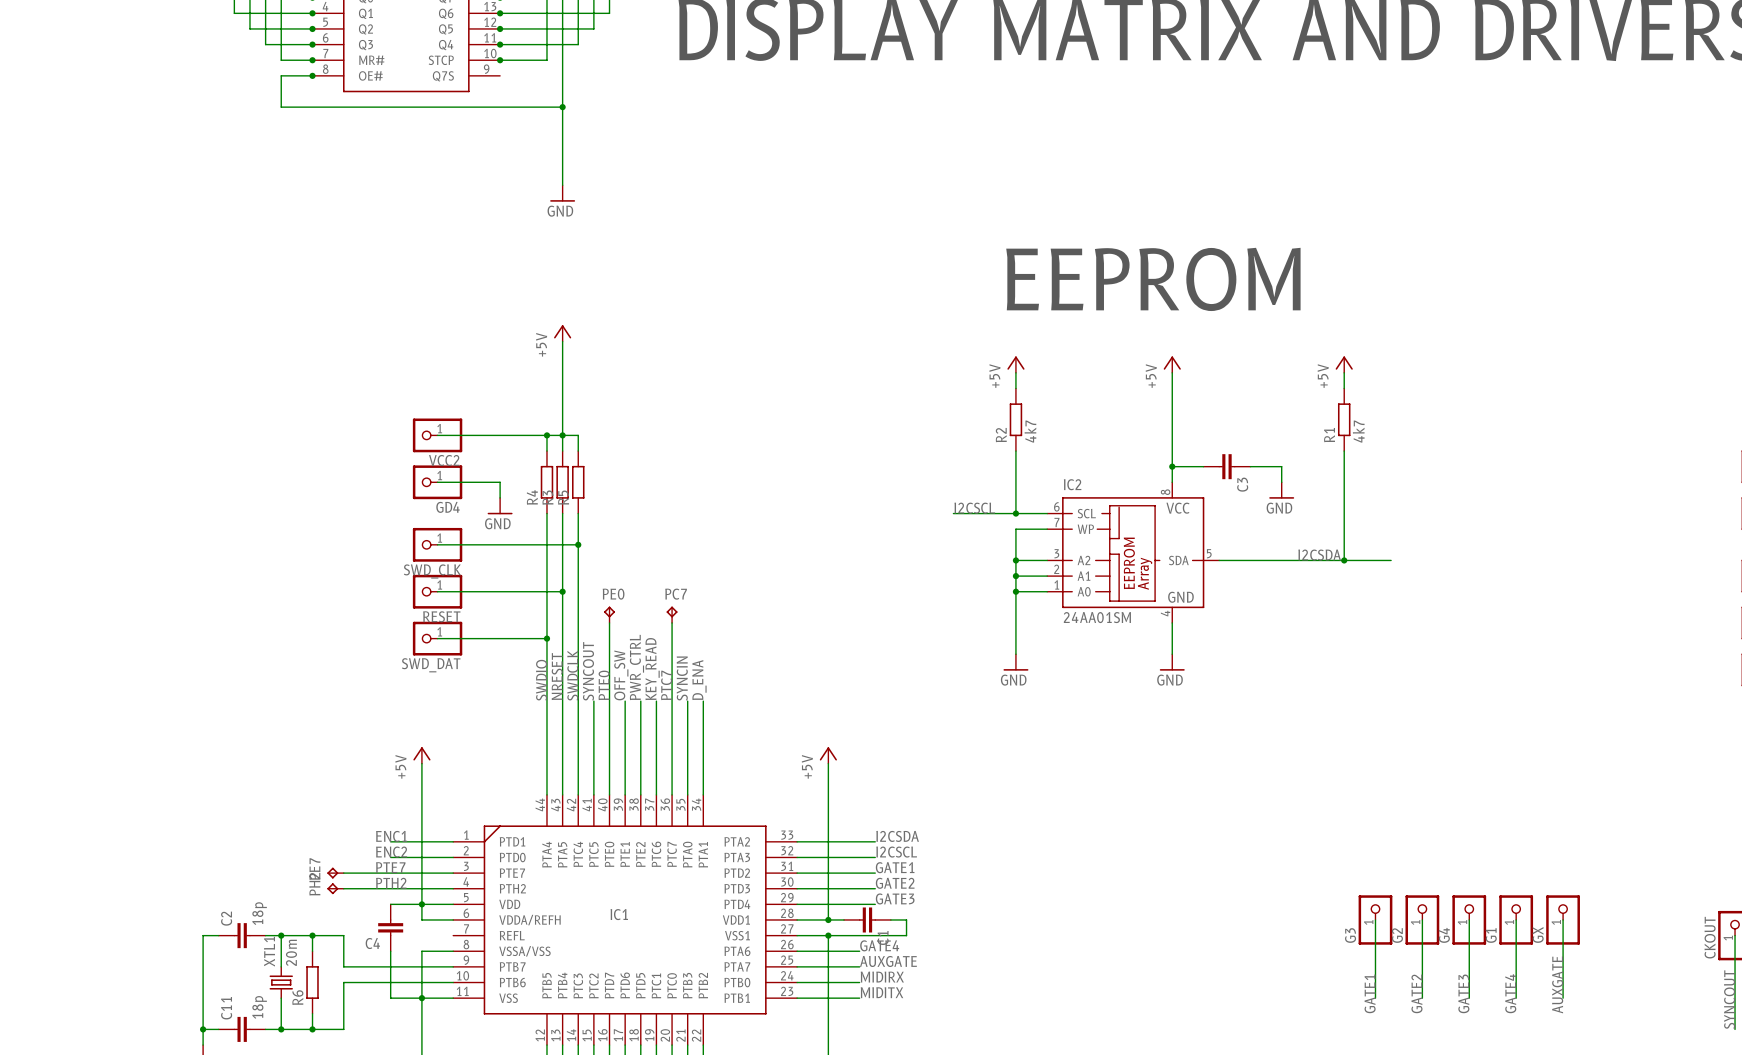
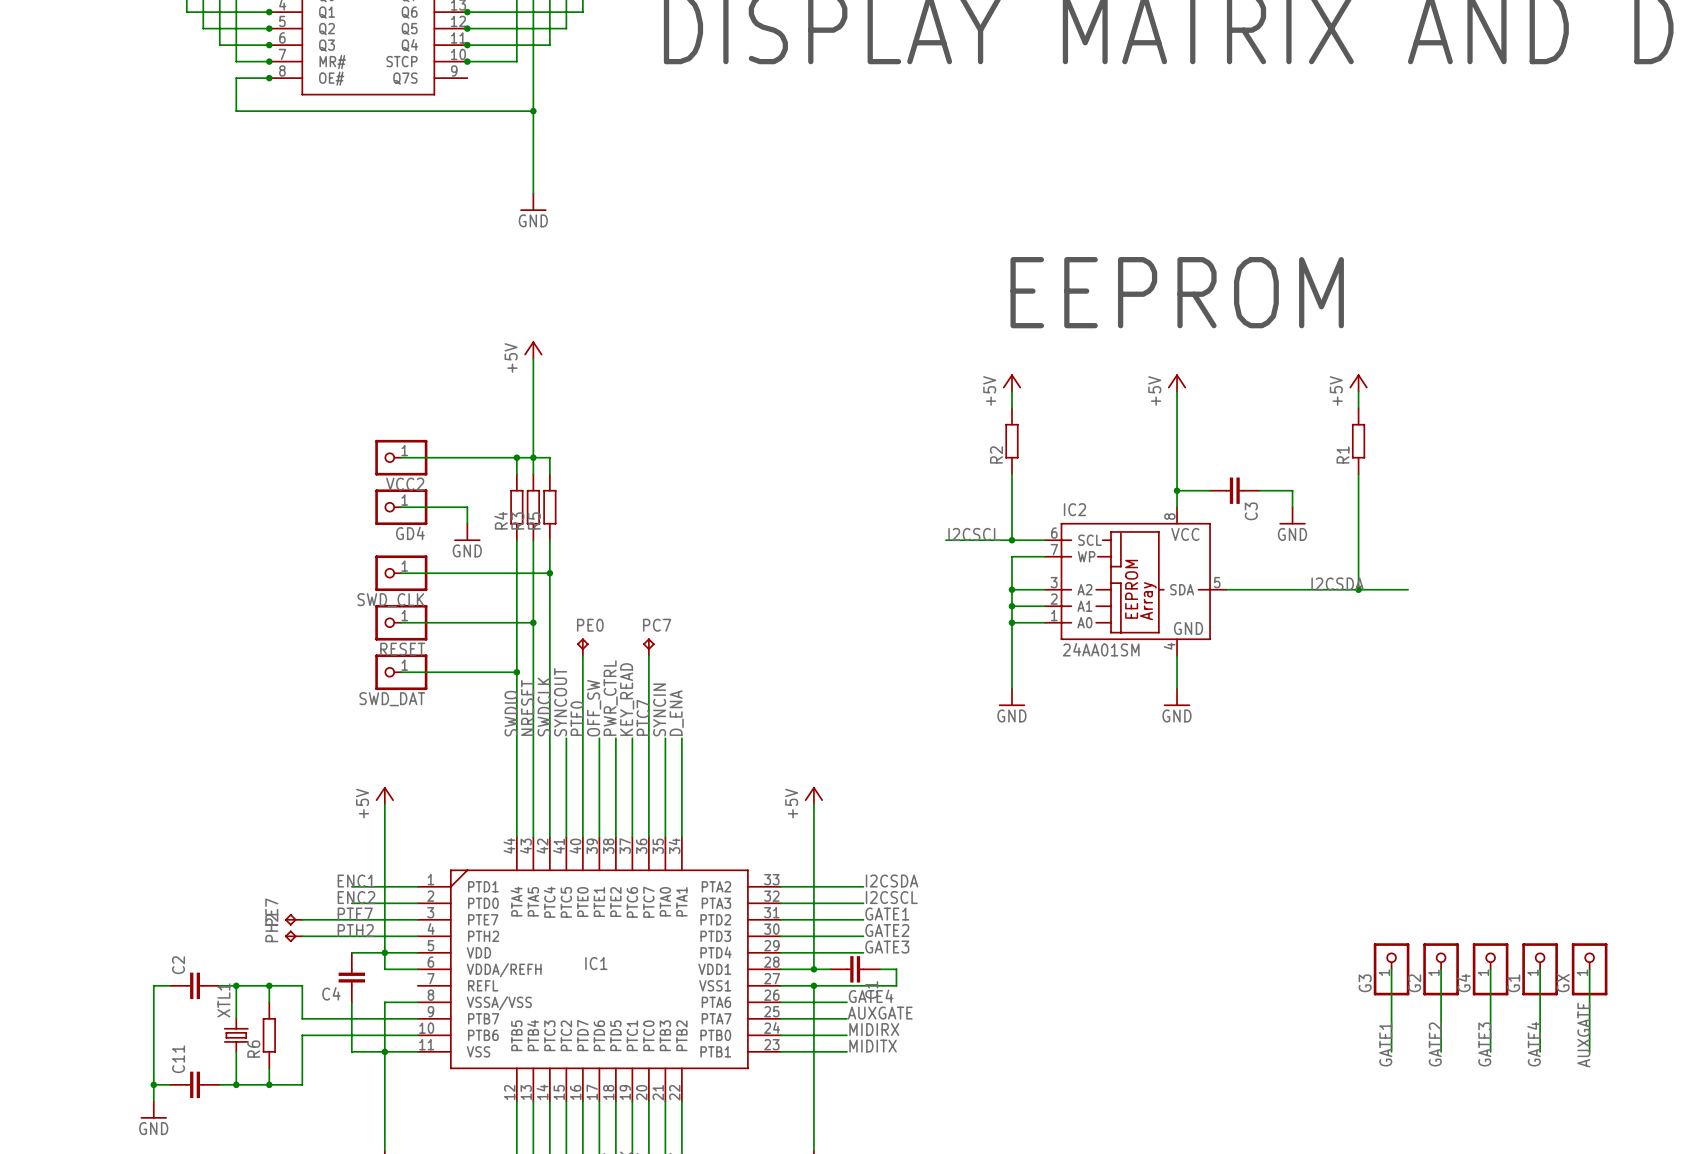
R2 value: 4k7 (1030, 431) -> none
R1 value: 4k7 (1358, 431) -> none
C2 value: 18p (259, 913) -> none
XTL1 value: 20m (291, 952) -> none
C11 value: 18p (259, 1007) -> none

